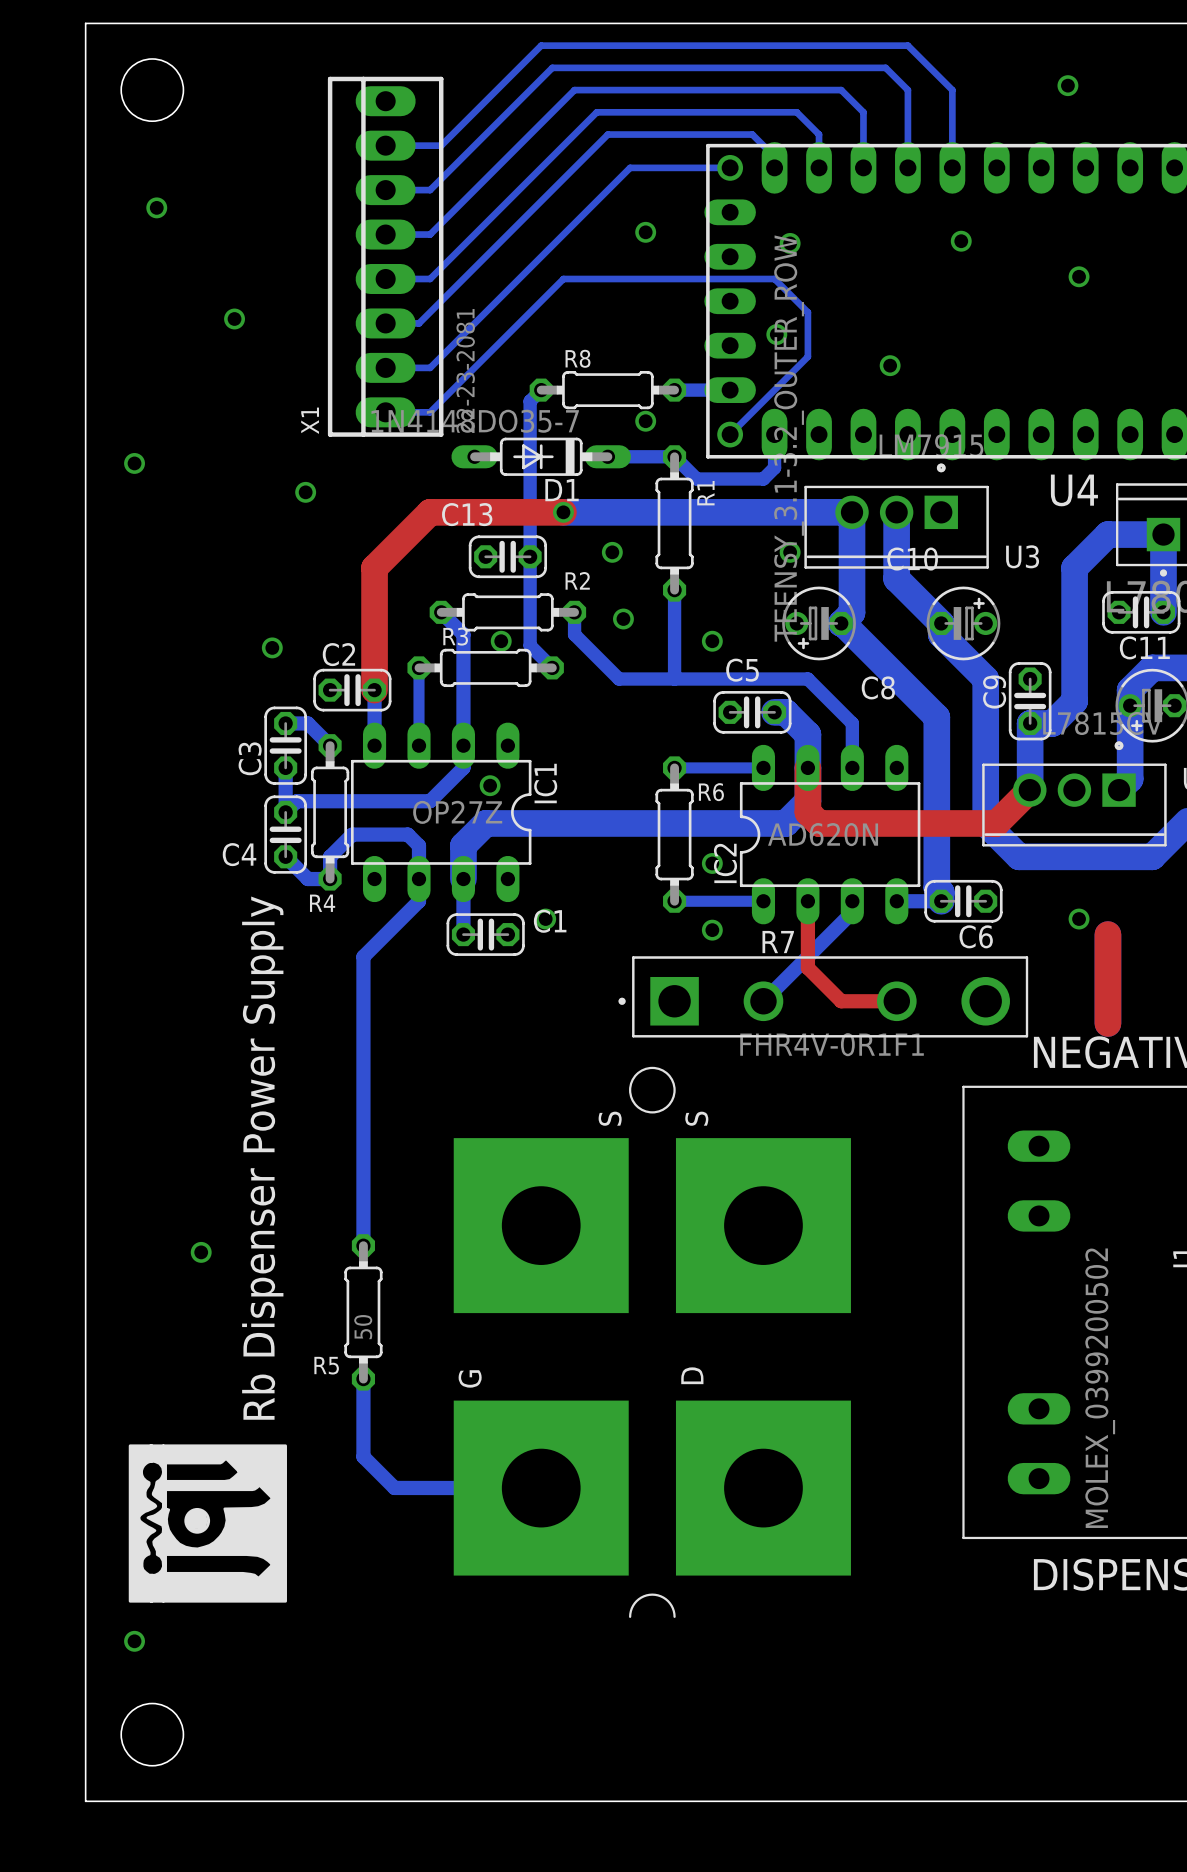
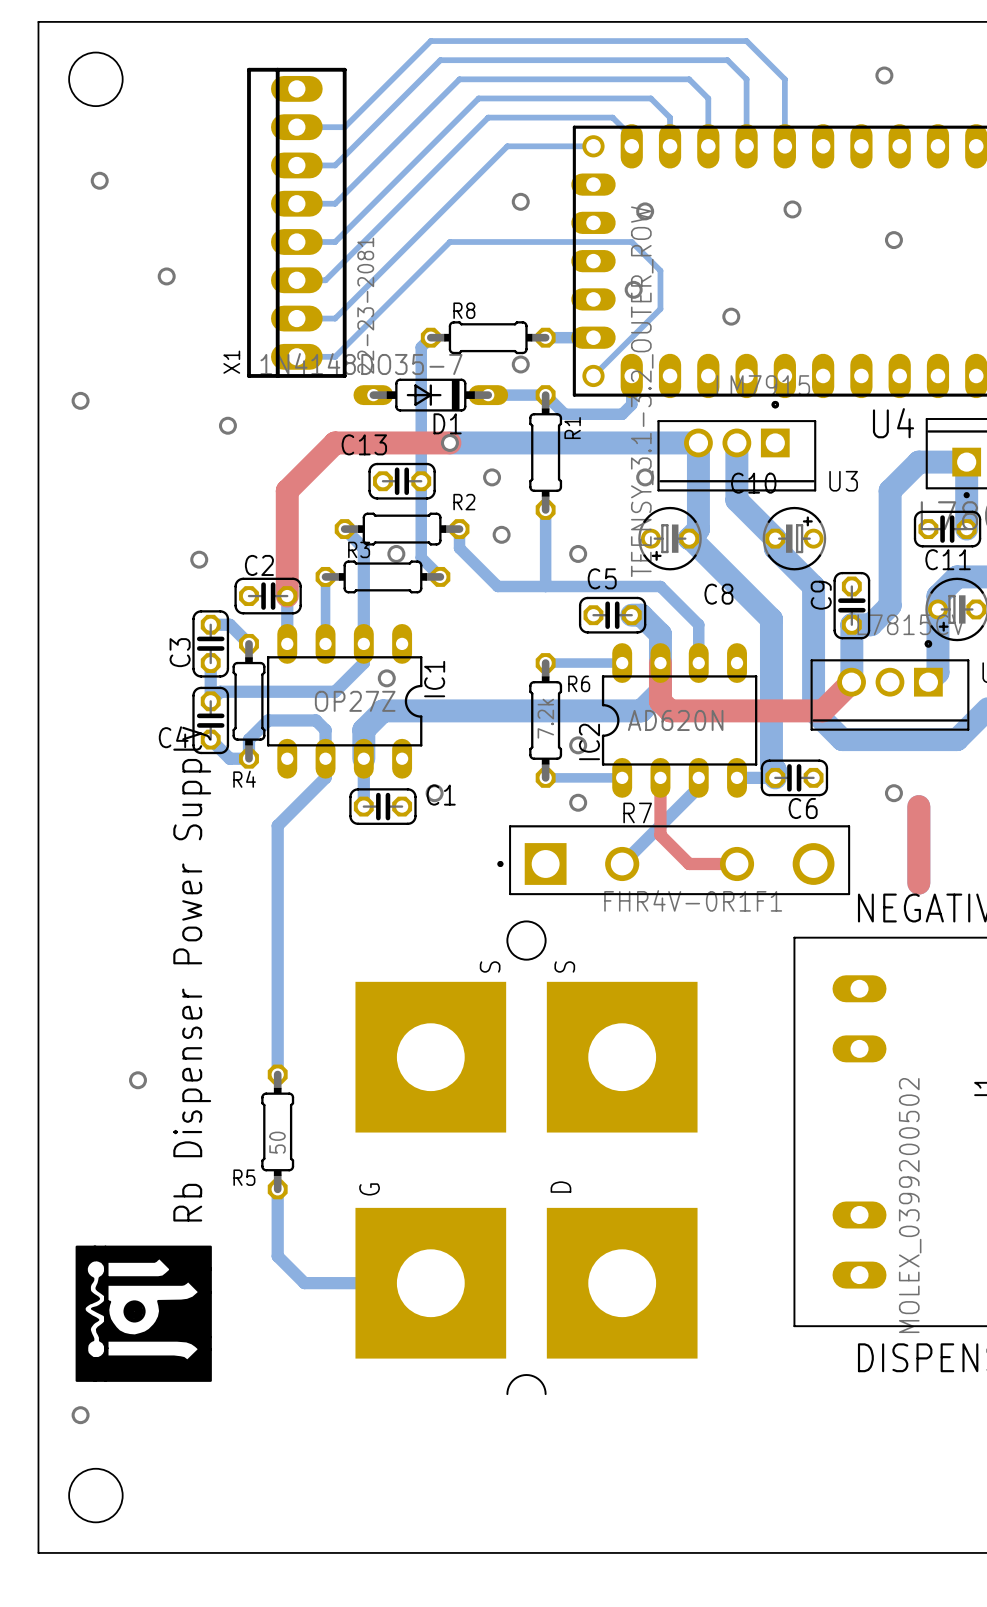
R6 value: none -> 7.2k (545, 718)

